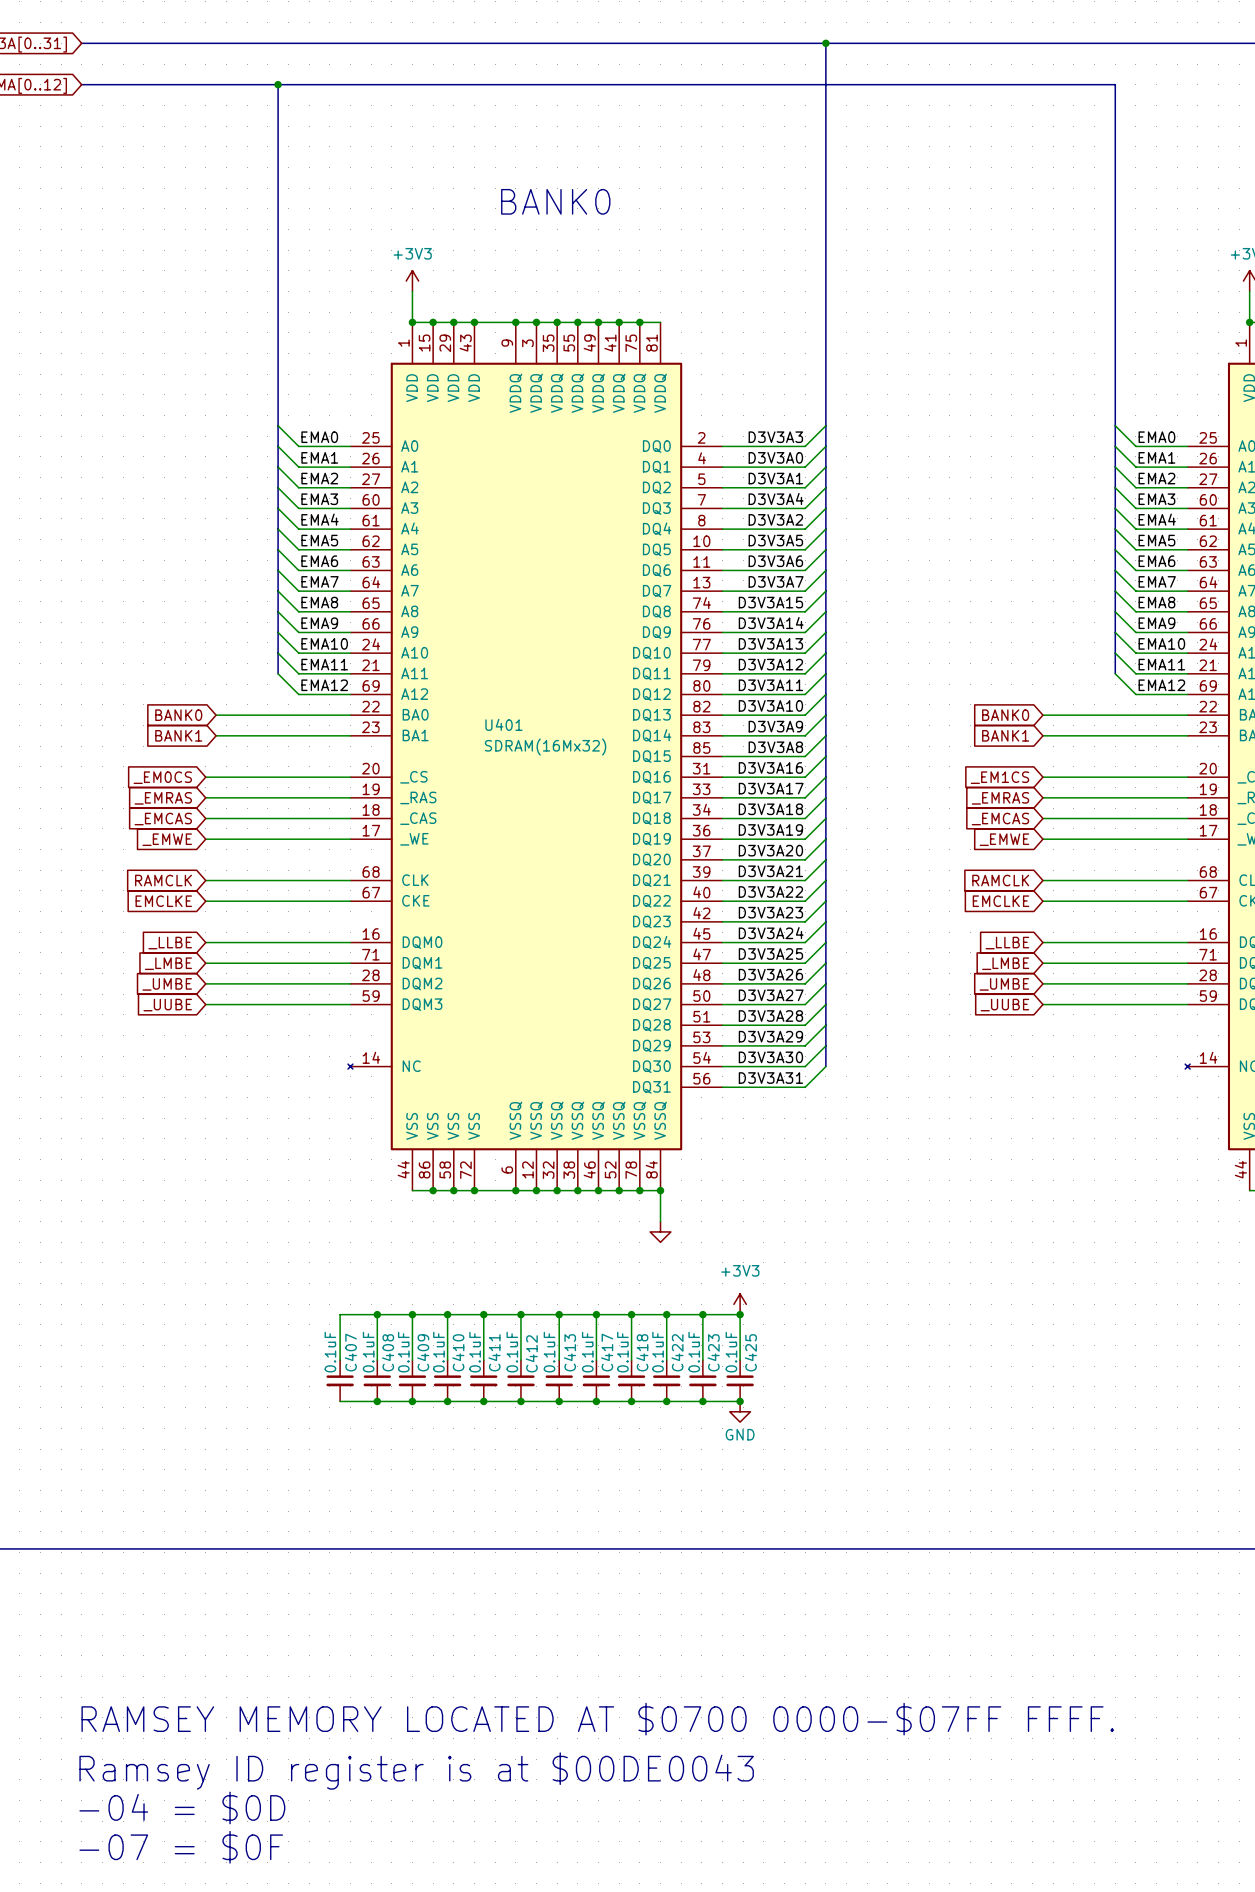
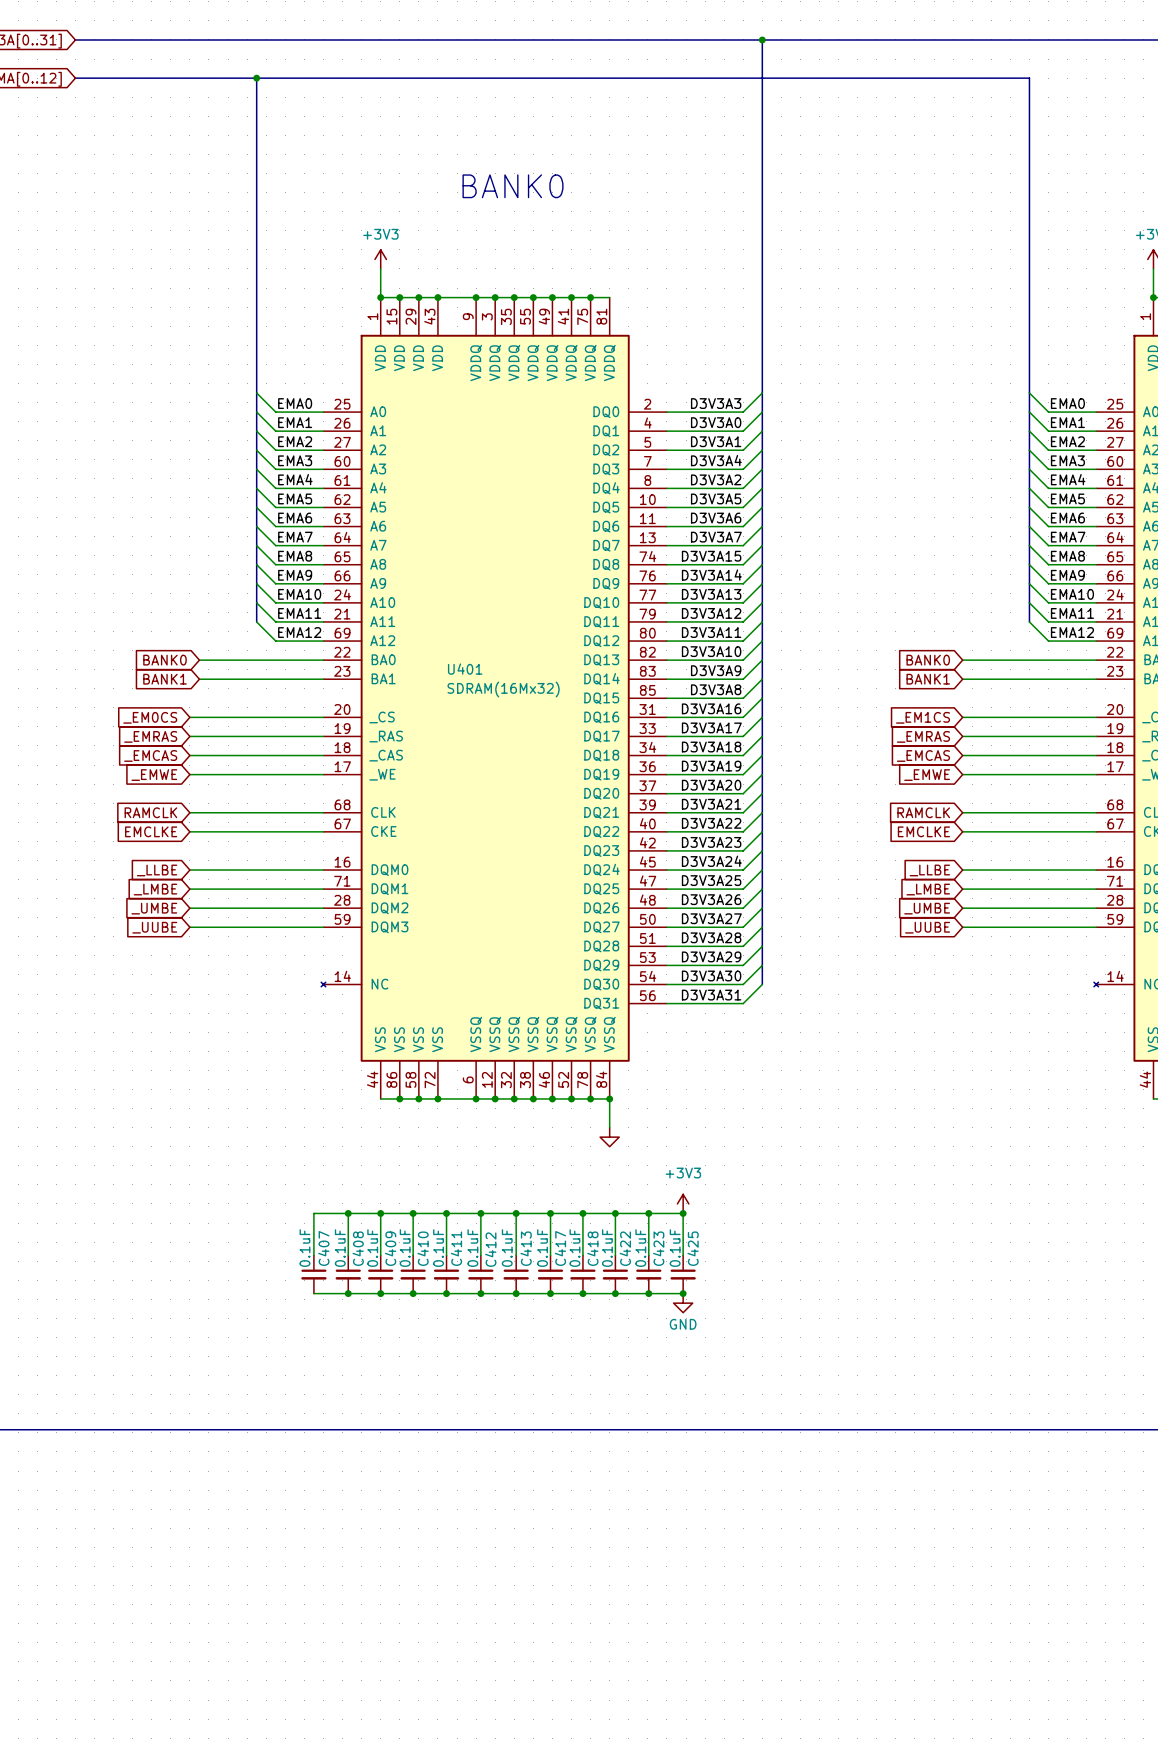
text: RAMSEY MEMORY LOCATED AT $0700 0000-$07FF FFFF. (597, 1719) -> none
text: Ramsey ID register is at $00DE0043 (416, 1770) -> none
text: -04 = $0D (182, 1807) -> none
text: -07 = $0F (181, 1847) -> none

